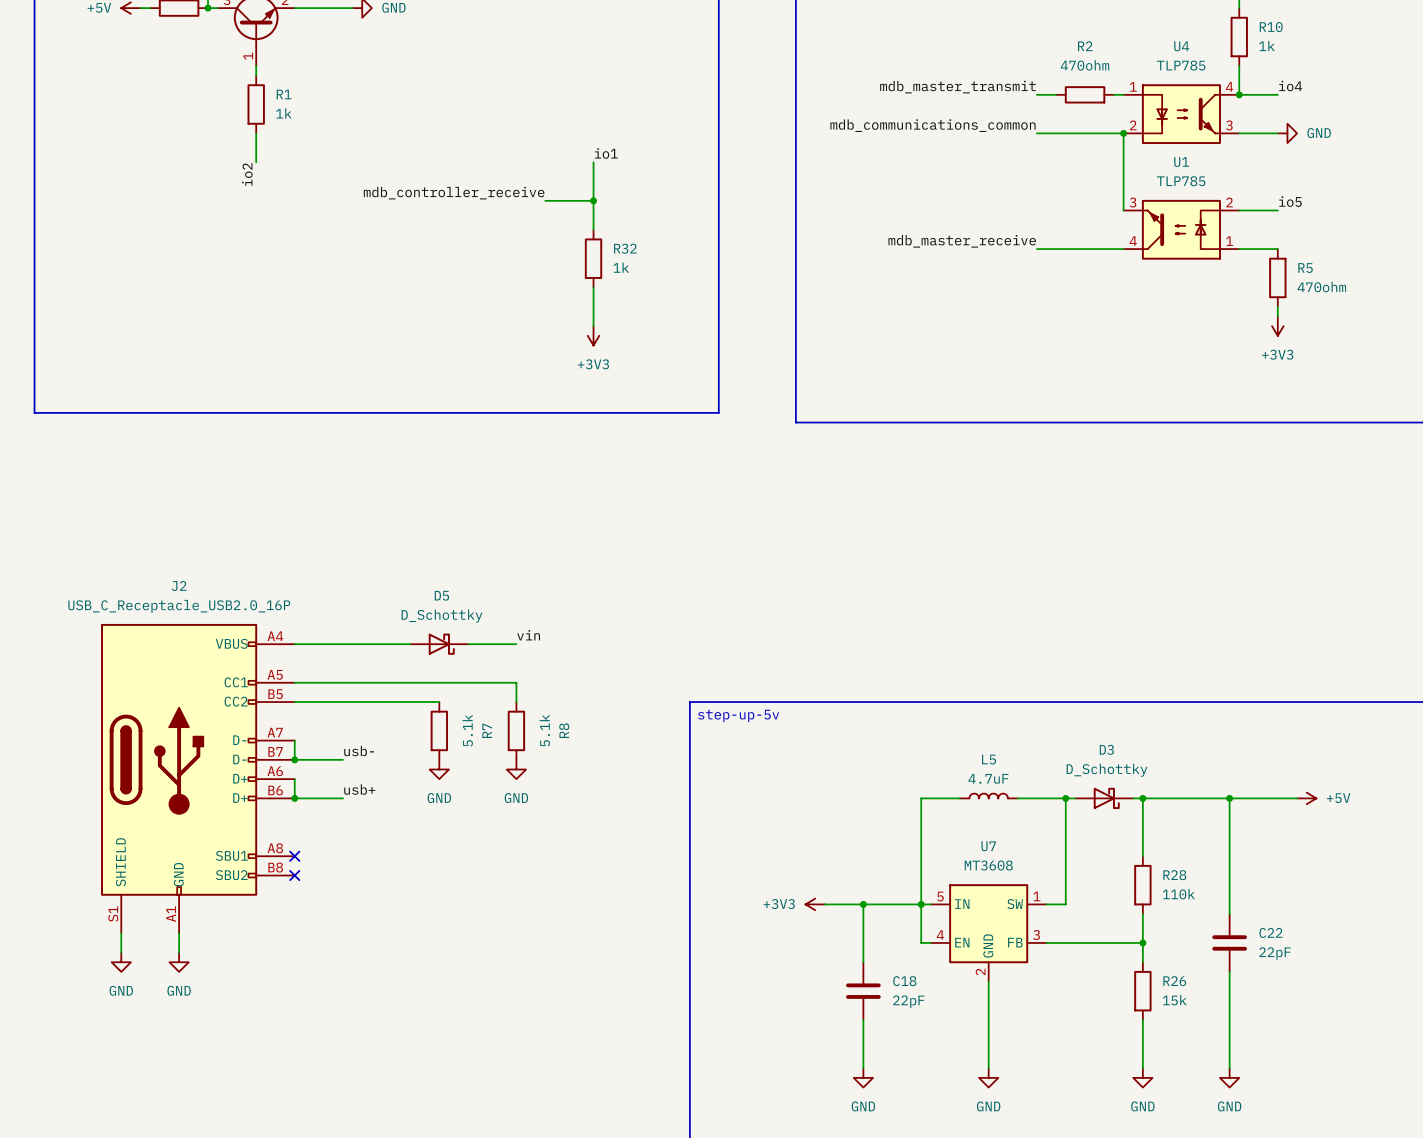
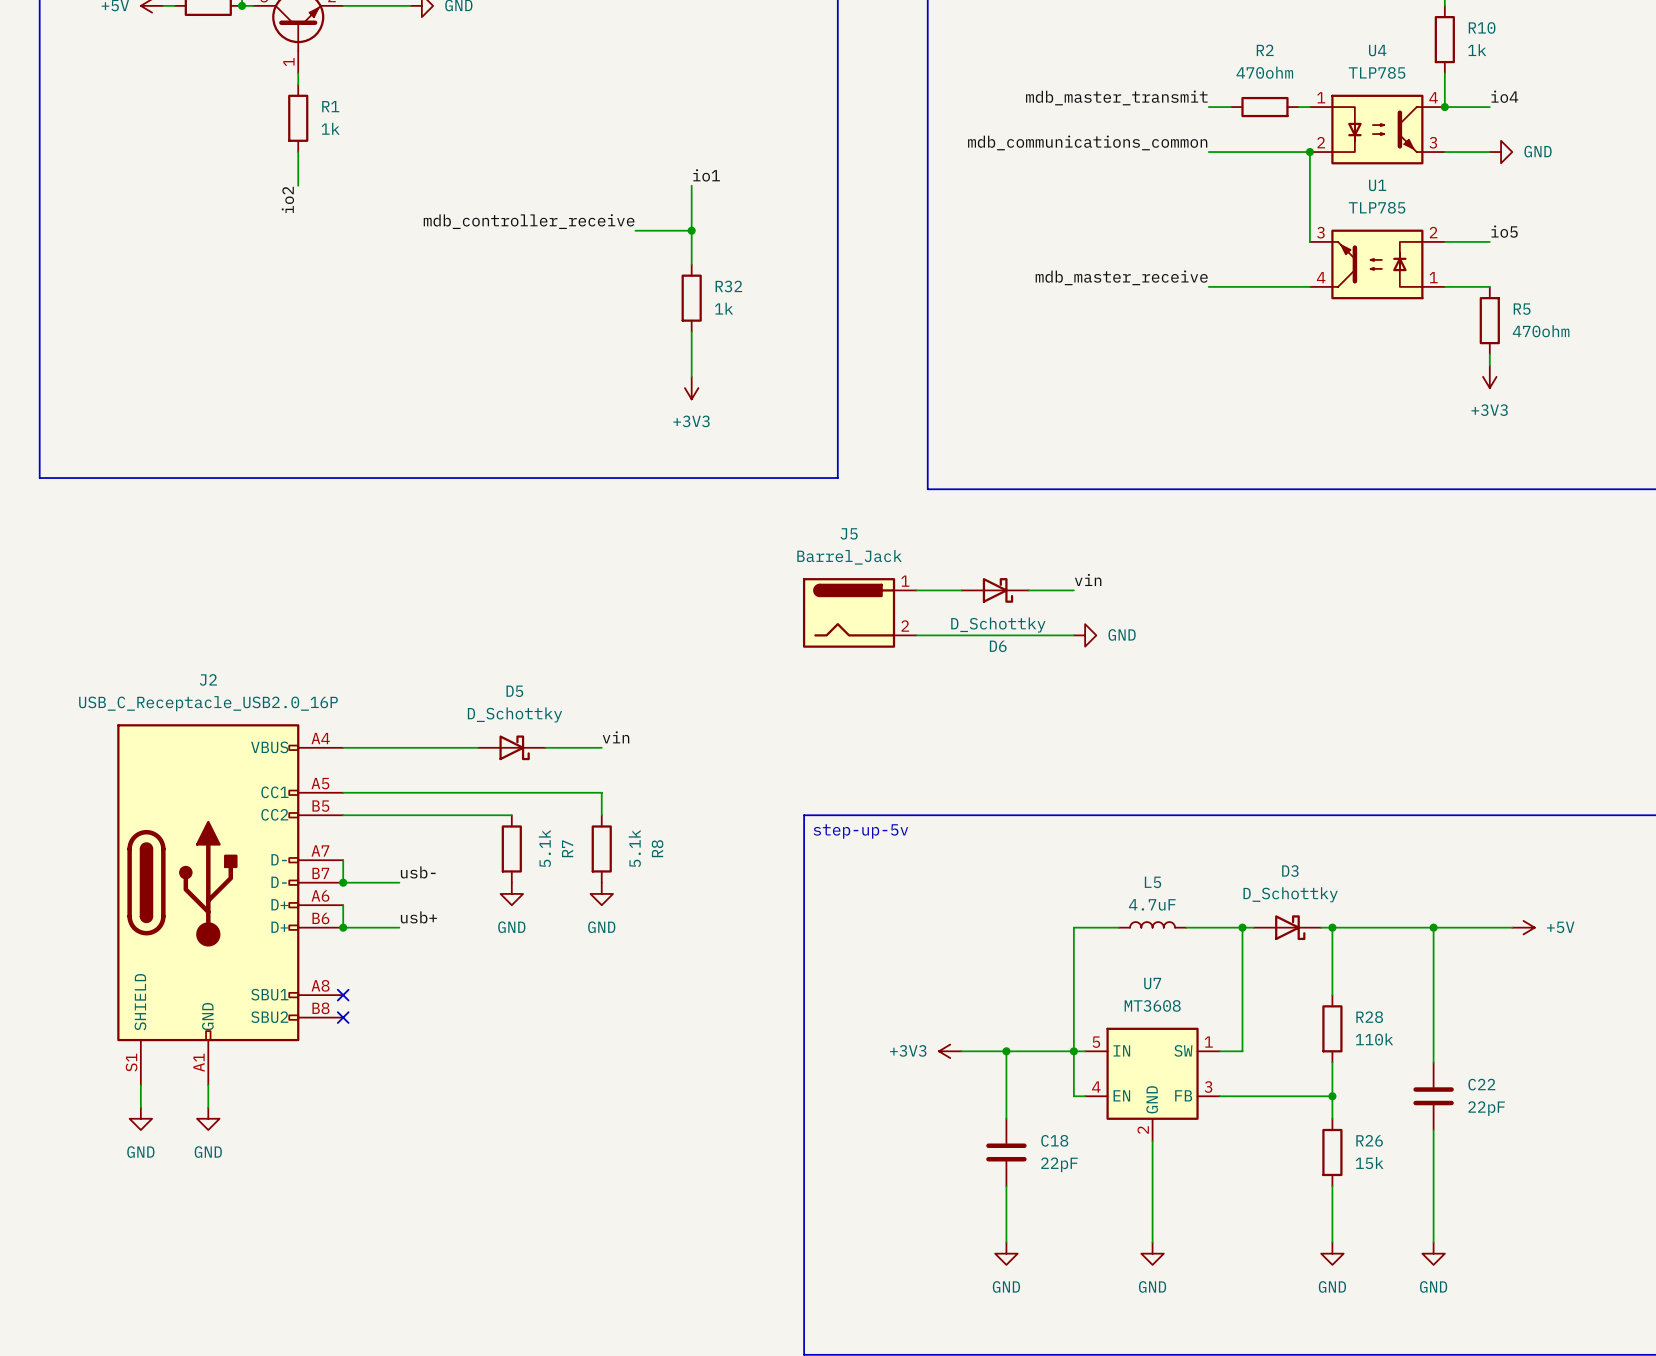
label: none -> vin (1088, 579)
wire: none -> (916, 590) (961, 590)
D6: none -> D_Schottky (995, 590)
wire: none -> (1028, 590) (1073, 590)
J5: none -> Barrel_Jack (859, 612)
wire: none -> (916, 635) (1073, 635)
power symbol: none -> GND (1085, 635)

